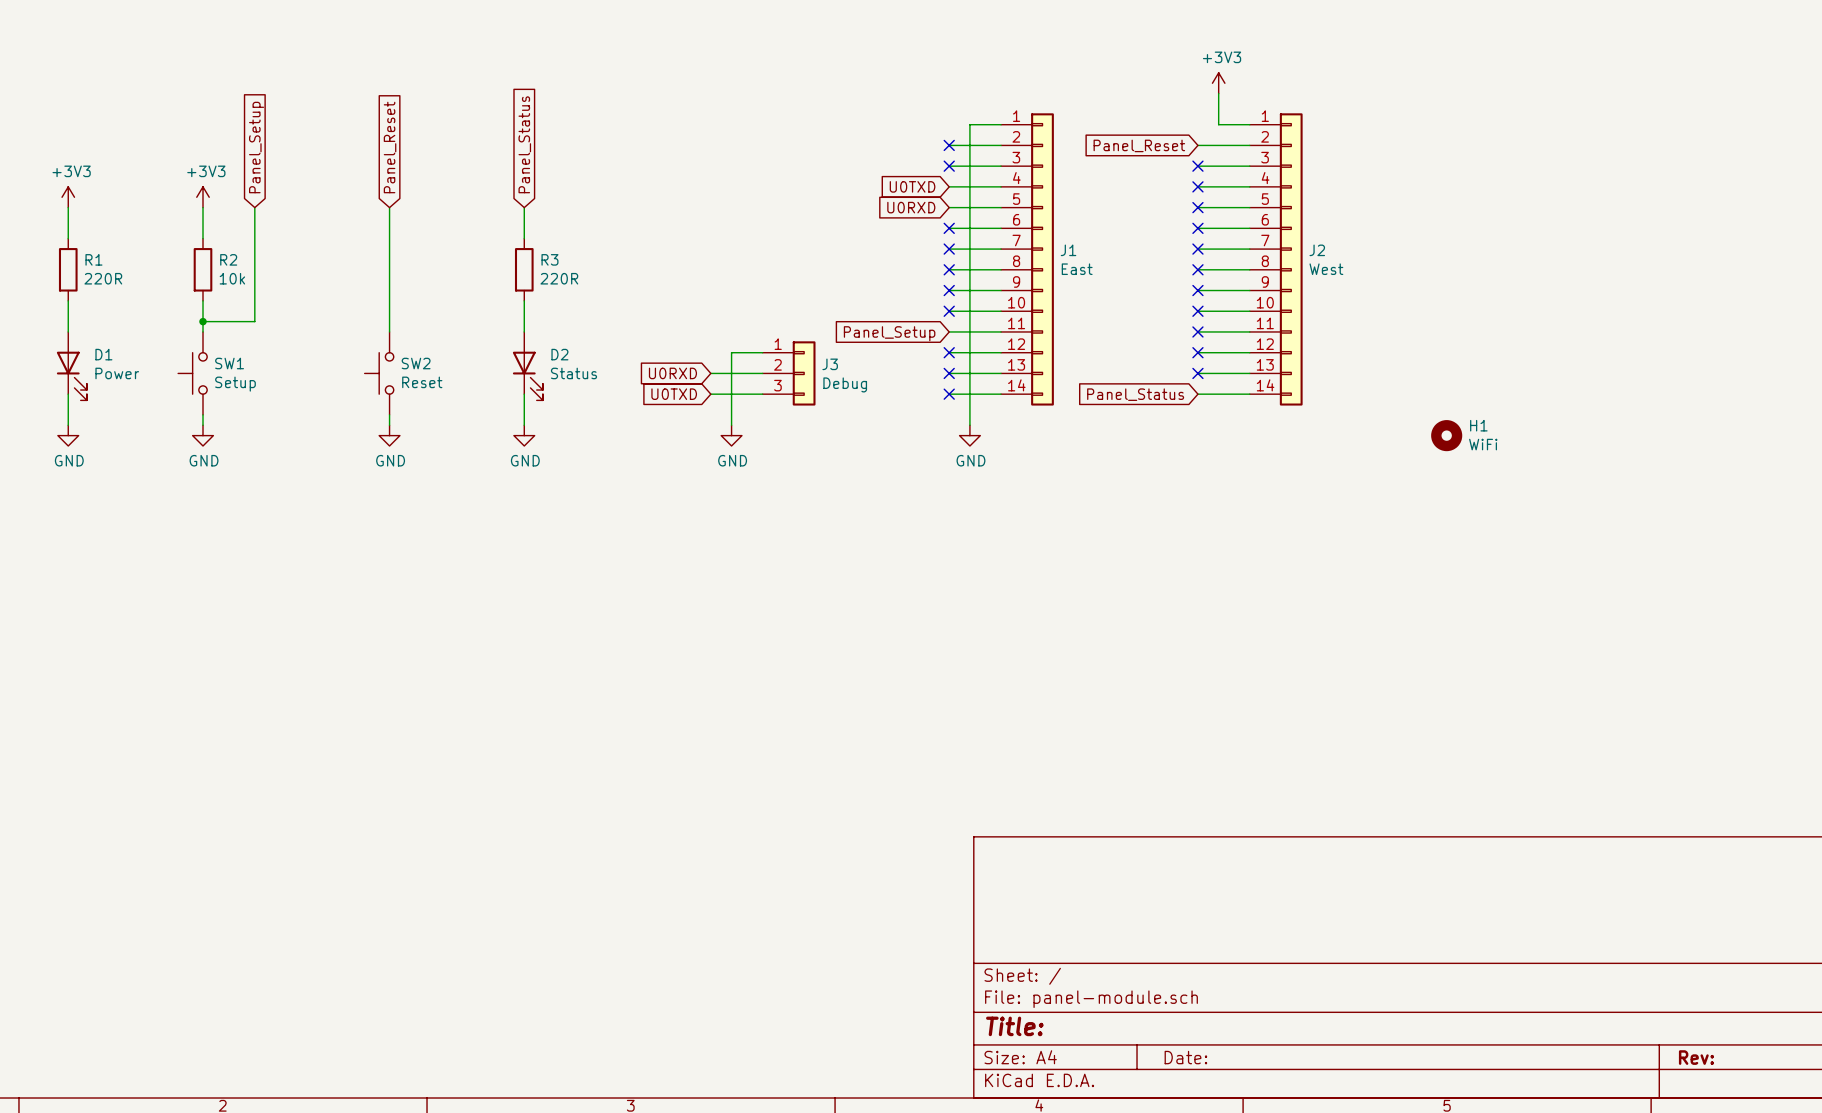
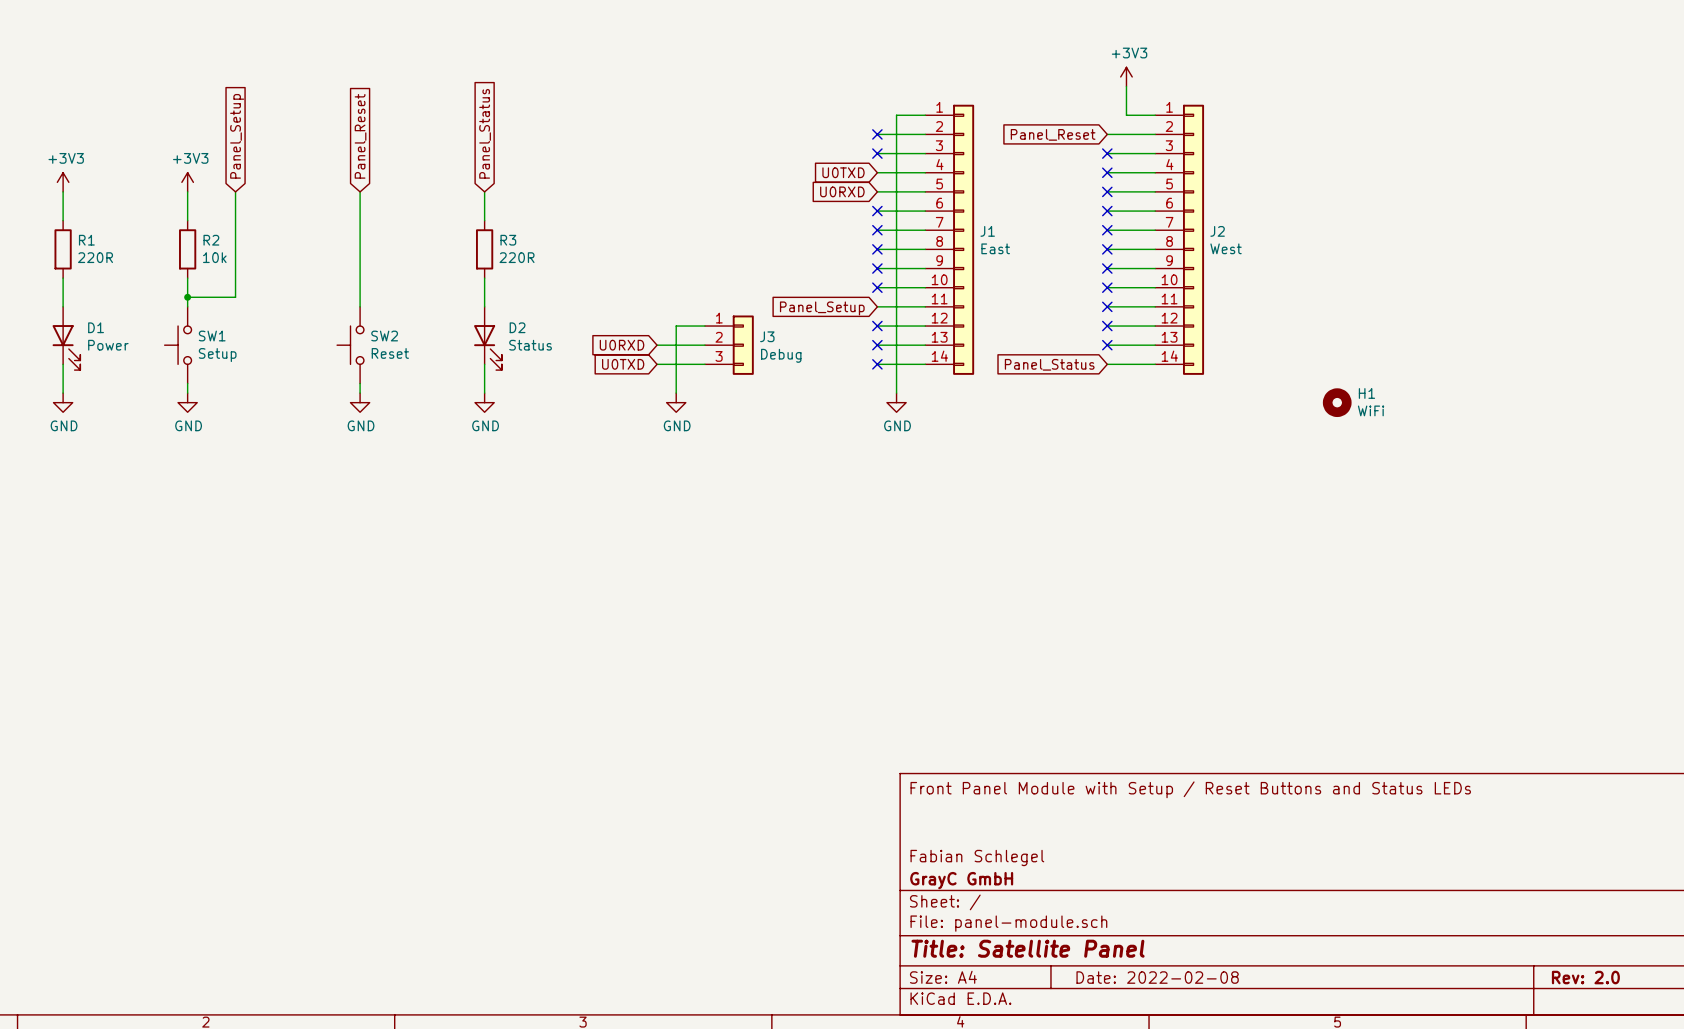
title block: none -> Front Panel Module with Setup / Reset Buttons and Status LEDs (1190, 789)
title block: none -> Fabian Schlegel (977, 857)
title block: none -> GrayC GmbH (961, 880)
title block: Title: (1014, 1026) -> Title: Satellite Panel (1028, 948)
title block: Date: (1185, 1057) -> Date: 2022-02-08 (1157, 977)
title block: Rev: (1696, 1057) -> Rev: 2.0 (1585, 977)

